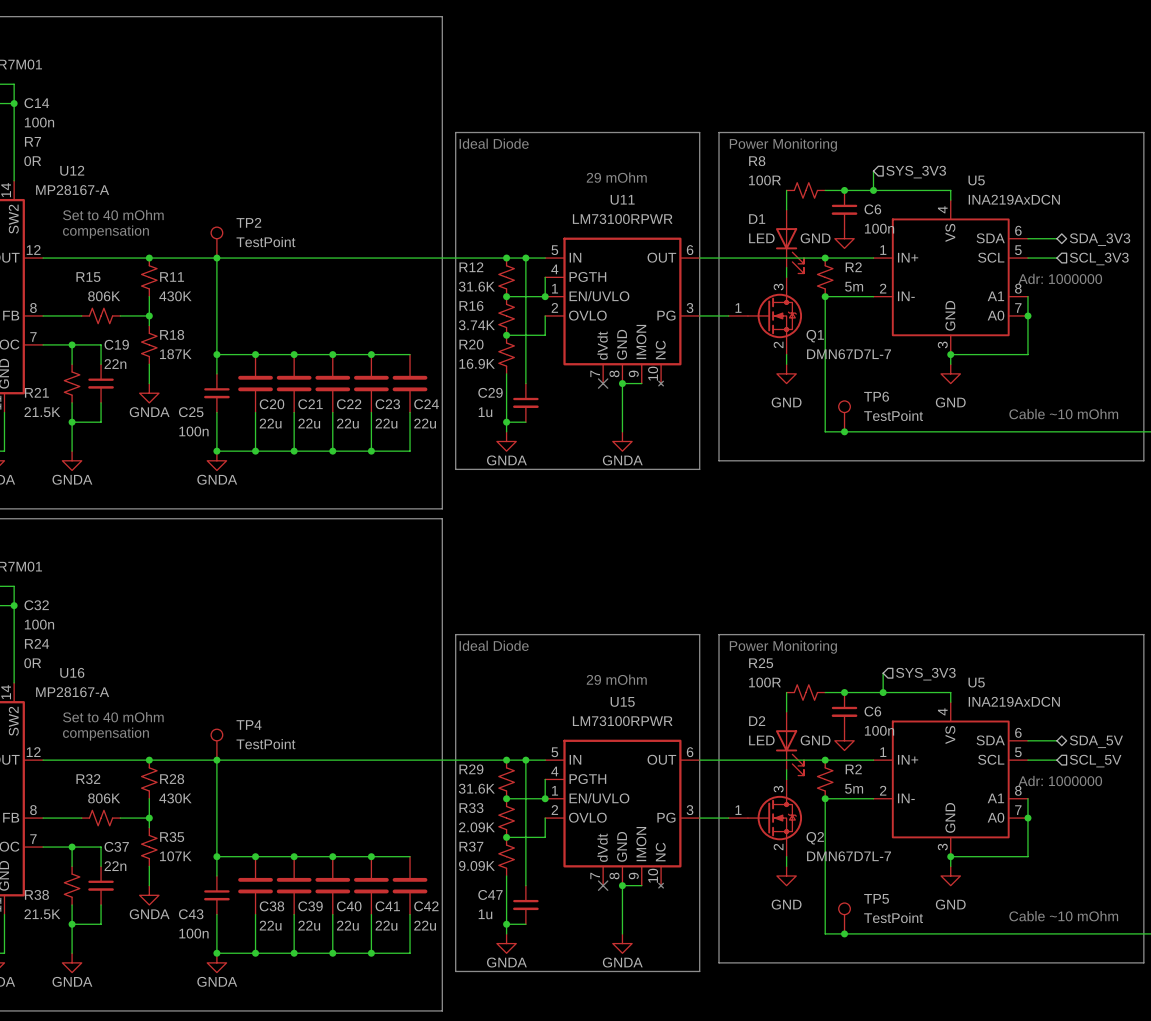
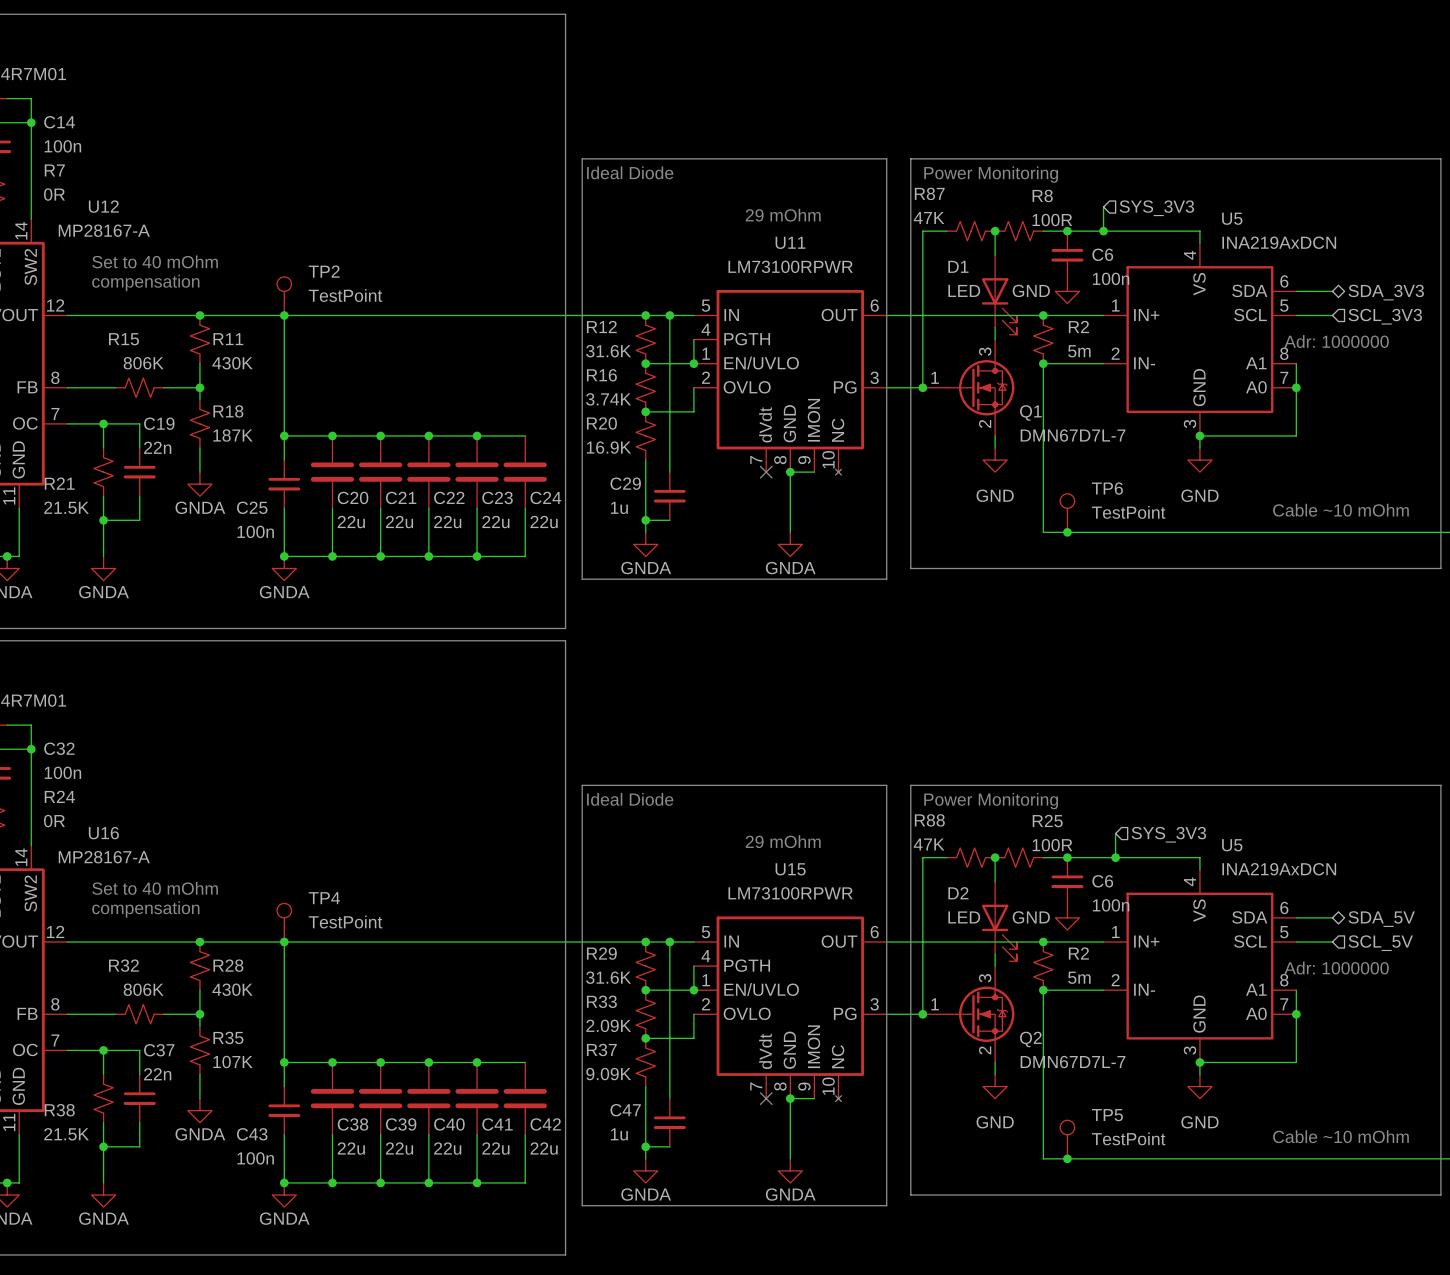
R8 name position: R8 (757, 161) -> R8 (1042, 195)
R8 value position: 100R (764, 180) -> 100R (1052, 220)
wire: none -> (946, 231) (922, 231) (922, 387)
R87: none -> 47K (971, 231)
junction: none -> (995, 231)
junction: none -> (922, 387)
R25 name position: R25 (761, 663) -> R25 (1047, 821)
R25 value position: 100R (764, 682) -> 100R (1052, 845)
wire: none -> (946, 857) (922, 857) (922, 1014)
R88: none -> 47K (971, 857)
junction: none -> (995, 857)
junction: none -> (922, 1014)

